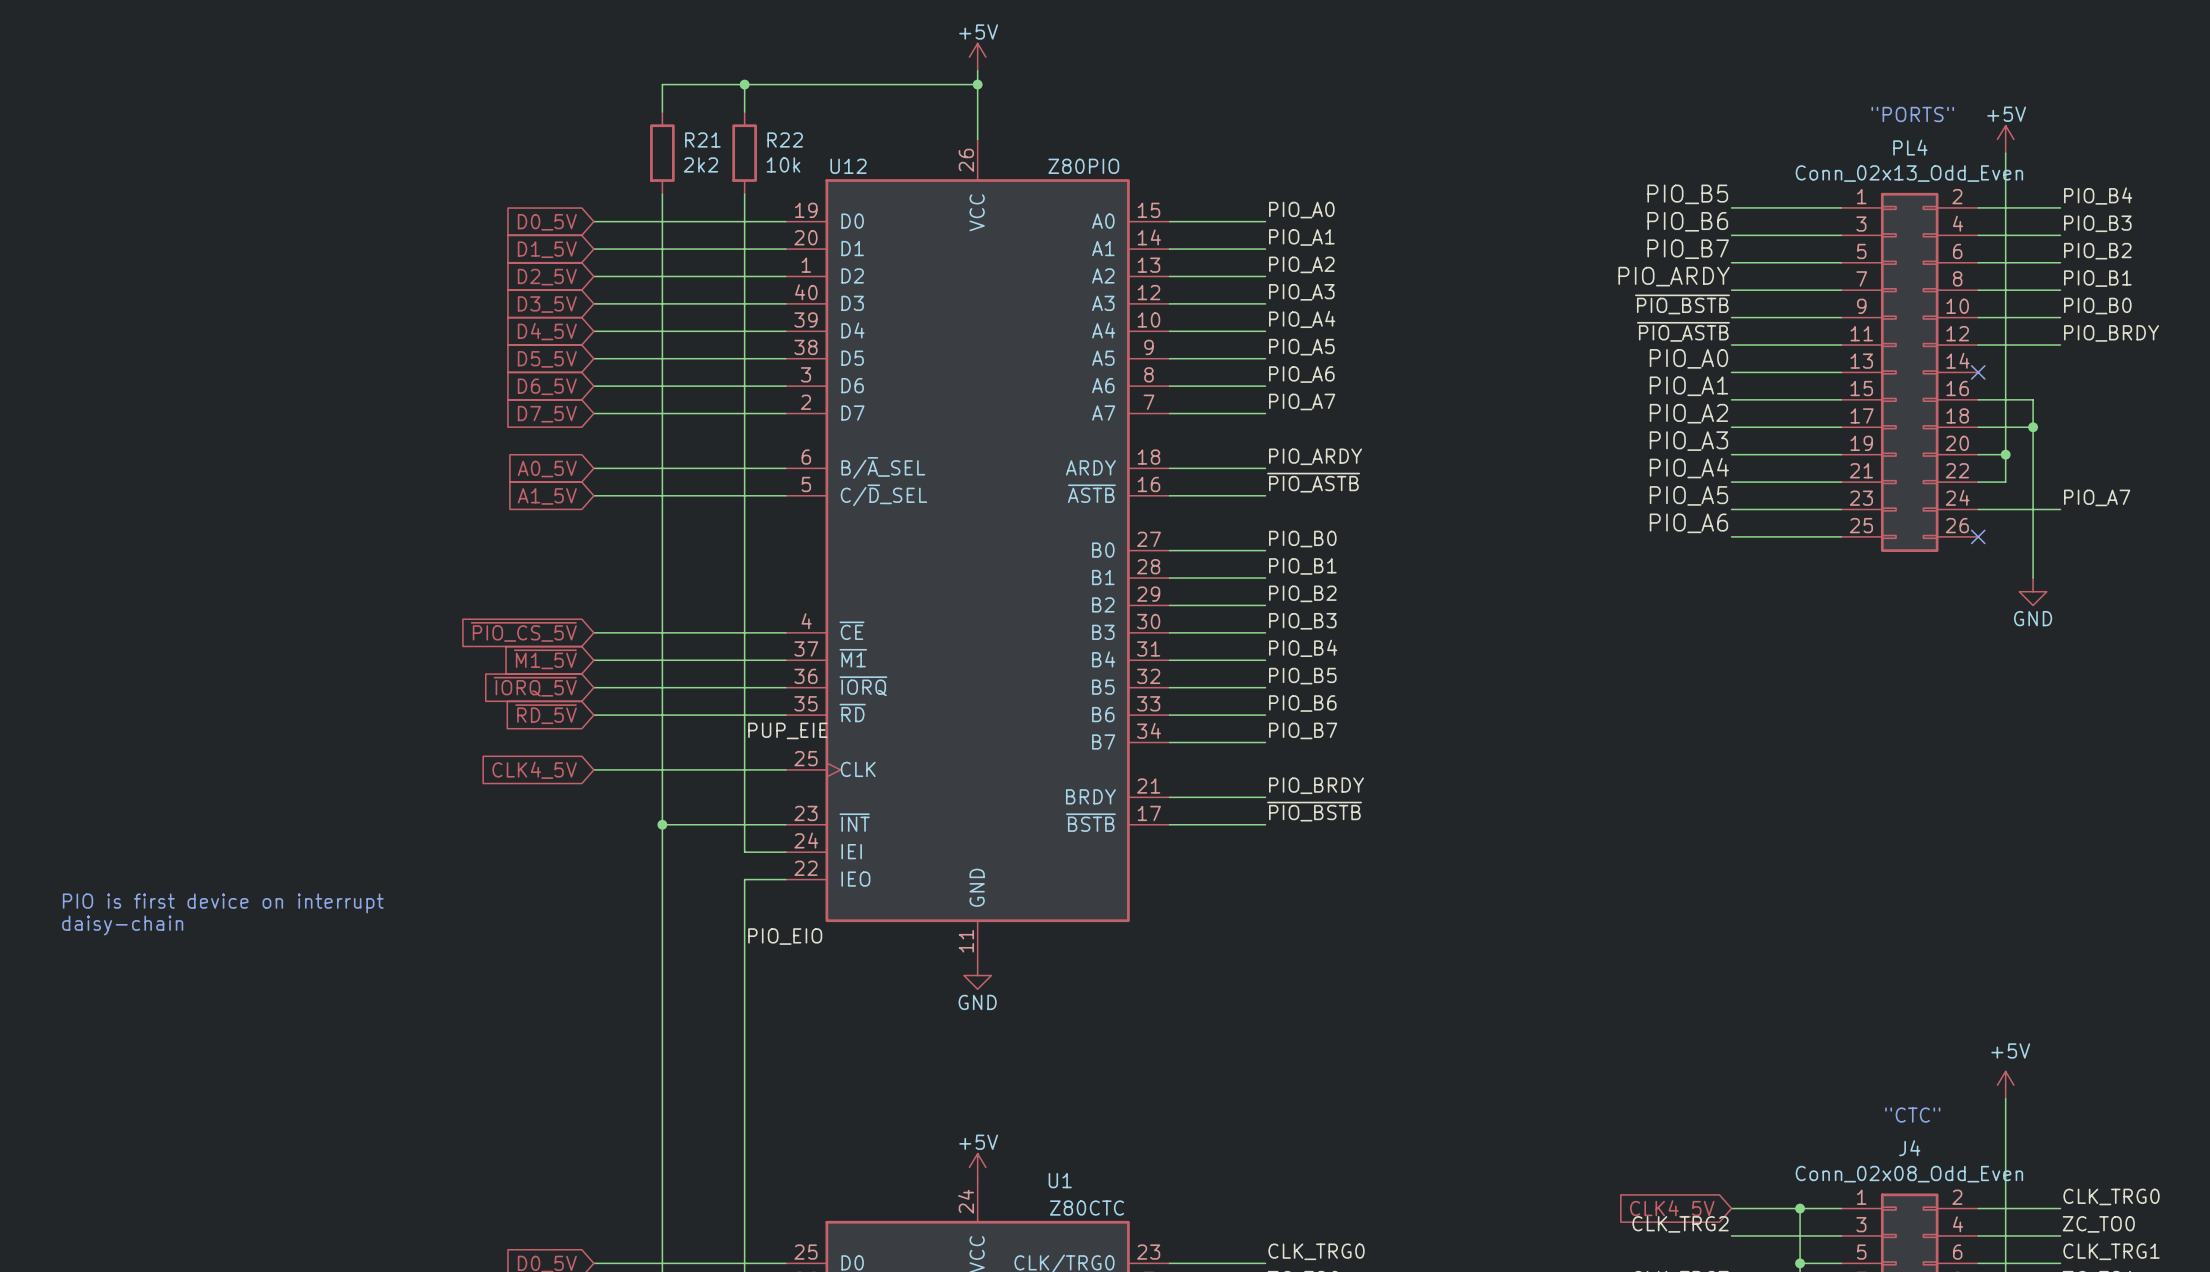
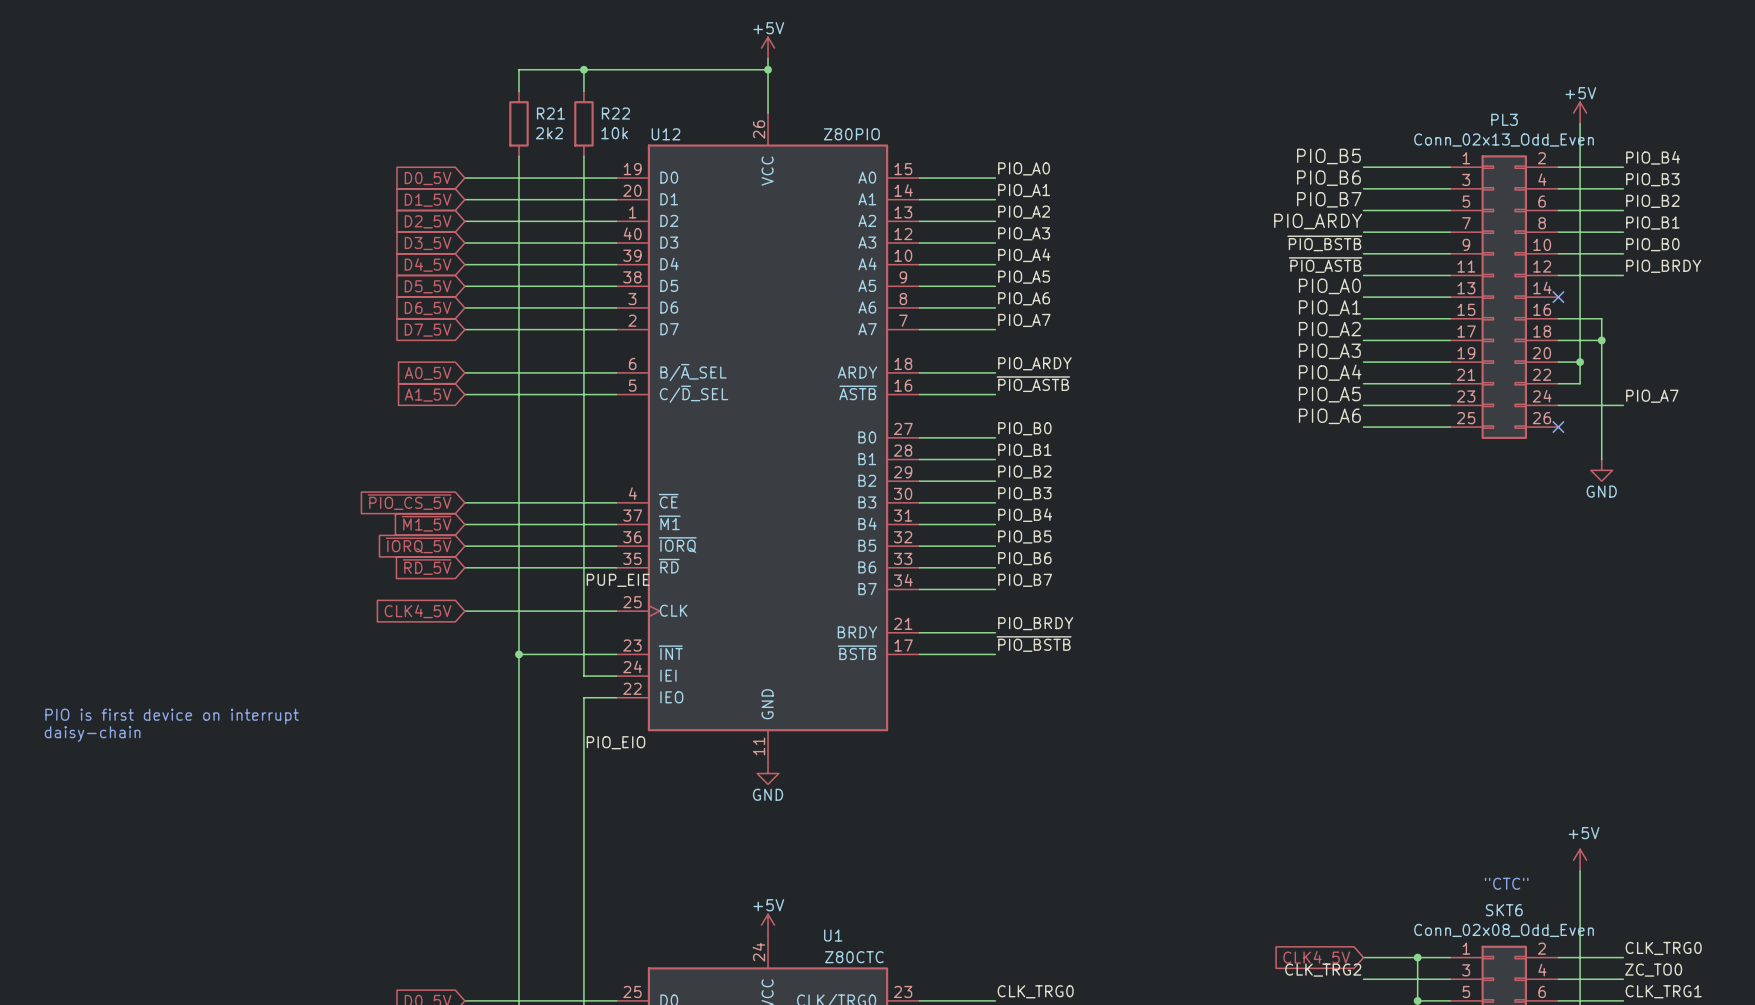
text: "PORTS" (1912, 114) -> none
PL4 name: PL4 (1910, 147) -> PL3 (1504, 119)
J4 name: J4 (1909, 1148) -> SKT6 (1504, 910)

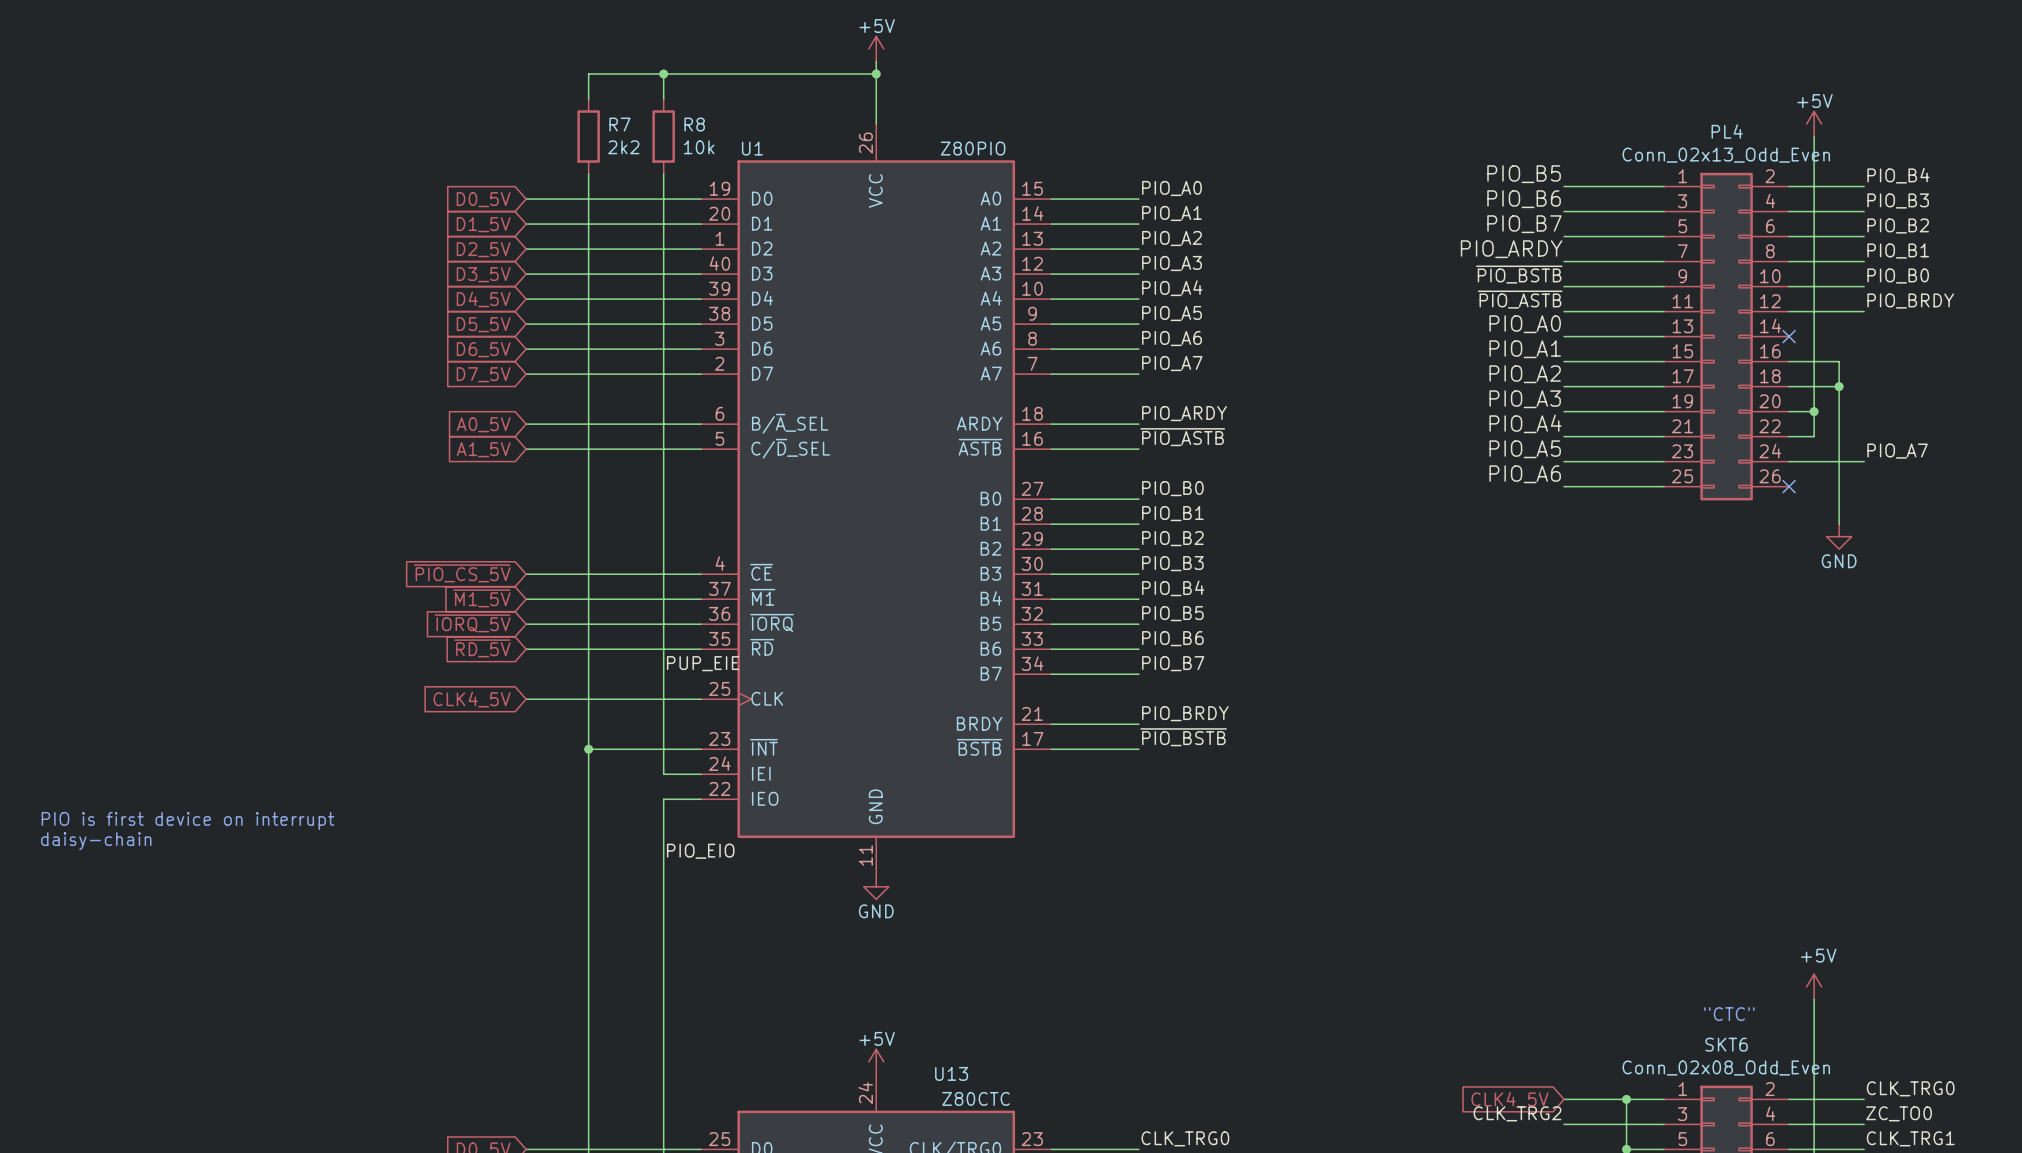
R21 name: R21 (550, 113) -> R7 (619, 124)
R22 name: R22 (615, 113) -> R8 (694, 124)
PL3 name: PL3 (1504, 119) -> PL4 (1727, 131)
U12 name: U12 (666, 134) -> U1 (752, 148)
U1 name: U1 (833, 935) -> U13 (951, 1073)

